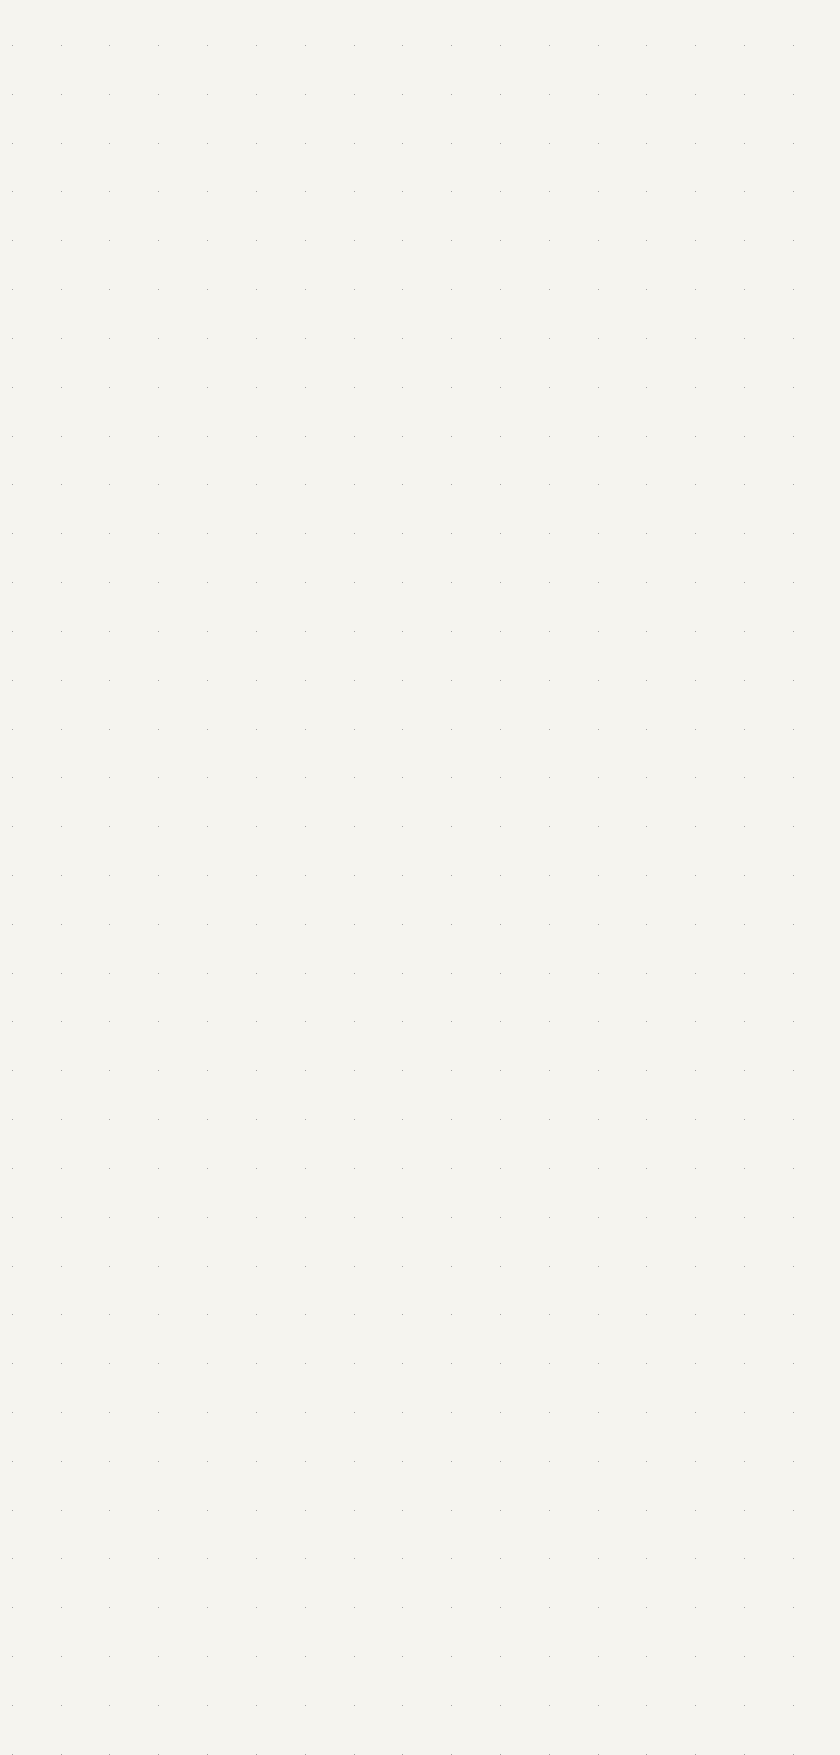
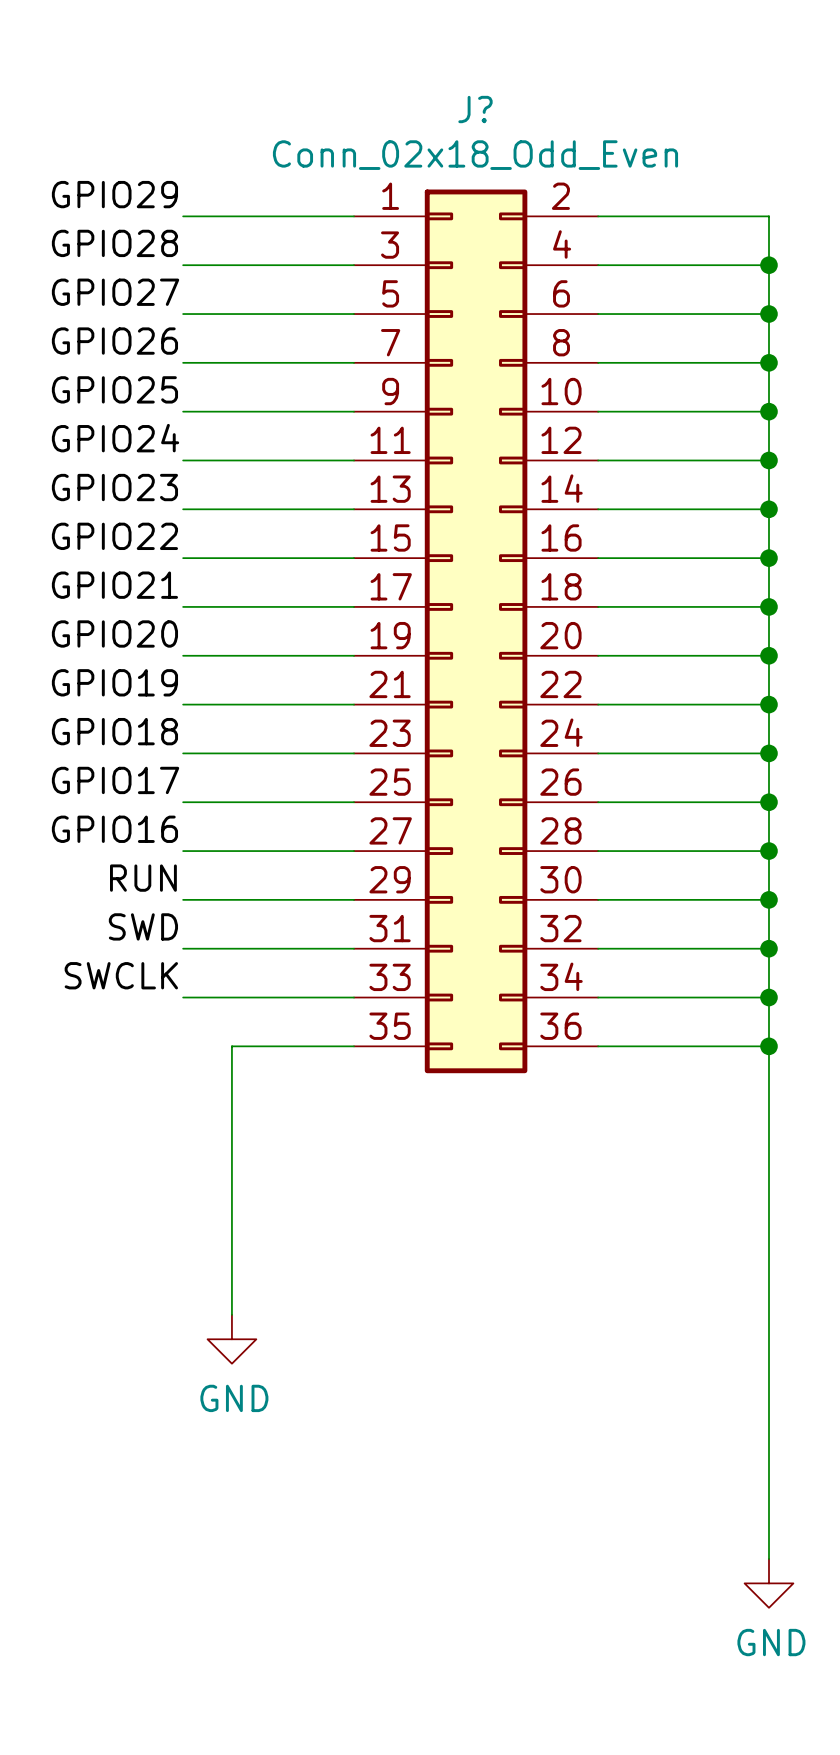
label: none -> GPIO29 (114, 194)
wire: none -> (183, 216) (354, 216)
wire: none -> (598, 216) (768, 216) (768, 1558)
label: none -> GPIO28 (114, 243)
wire: none -> (183, 265) (354, 265)
wire: none -> (598, 265) (768, 265)
junction: none -> (768, 265)
label: none -> GPIO27 (115, 292)
wire: none -> (183, 314) (354, 314)
wire: none -> (598, 314) (768, 314)
junction: none -> (768, 314)
label: none -> GPIO26 (114, 341)
wire: none -> (183, 362) (354, 362)
wire: none -> (598, 362) (768, 362)
junction: none -> (768, 362)
label: none -> GPIO25 (114, 389)
wire: none -> (183, 411) (354, 411)
wire: none -> (598, 411) (768, 411)
junction: none -> (768, 411)
label: none -> GPIO24 (115, 438)
wire: none -> (183, 460) (354, 460)
wire: none -> (598, 460) (768, 460)
junction: none -> (768, 460)
label: none -> GPIO23 (114, 487)
wire: none -> (183, 509) (354, 509)
wire: none -> (598, 509) (768, 509)
junction: none -> (768, 509)
label: none -> GPIO22 (114, 536)
wire: none -> (183, 558) (354, 558)
wire: none -> (598, 558) (768, 558)
junction: none -> (768, 558)
label: none -> GPIO21 (114, 585)
wire: none -> (183, 606) (354, 606)
wire: none -> (598, 606) (768, 606)
junction: none -> (768, 606)
J?: none -> Conn_02x18_Odd_Even (476, 631)
label: none -> GPIO20 (114, 633)
wire: none -> (183, 655) (354, 655)
wire: none -> (598, 655) (768, 655)
junction: none -> (768, 655)
label: none -> GPIO19 (114, 682)
wire: none -> (183, 704) (354, 704)
wire: none -> (598, 704) (768, 704)
junction: none -> (768, 704)
label: none -> GPIO18 (114, 731)
wire: none -> (183, 753) (354, 753)
wire: none -> (598, 753) (768, 753)
junction: none -> (768, 753)
label: none -> GPIO17 (115, 780)
wire: none -> (183, 802) (354, 802)
wire: none -> (598, 802) (768, 802)
junction: none -> (768, 802)
label: none -> GPIO16 (114, 829)
wire: none -> (183, 851) (354, 851)
wire: none -> (598, 851) (768, 851)
junction: none -> (768, 851)
label: none -> RUN (143, 878)
wire: none -> (183, 899) (354, 899)
wire: none -> (598, 899) (768, 899)
junction: none -> (768, 899)
label: none -> SWD (143, 926)
wire: none -> (183, 948) (354, 948)
wire: none -> (598, 948) (768, 948)
junction: none -> (768, 948)
label: none -> SWCLK (121, 975)
wire: none -> (183, 997) (354, 997)
wire: none -> (598, 997) (768, 997)
junction: none -> (768, 997)
wire: none -> (354, 1046) (231, 1046) (231, 1314)
wire: none -> (598, 1046) (768, 1046)
junction: none -> (768, 1046)
power symbol: none -> GND (231, 1339)
power symbol: none -> GND (768, 1583)

